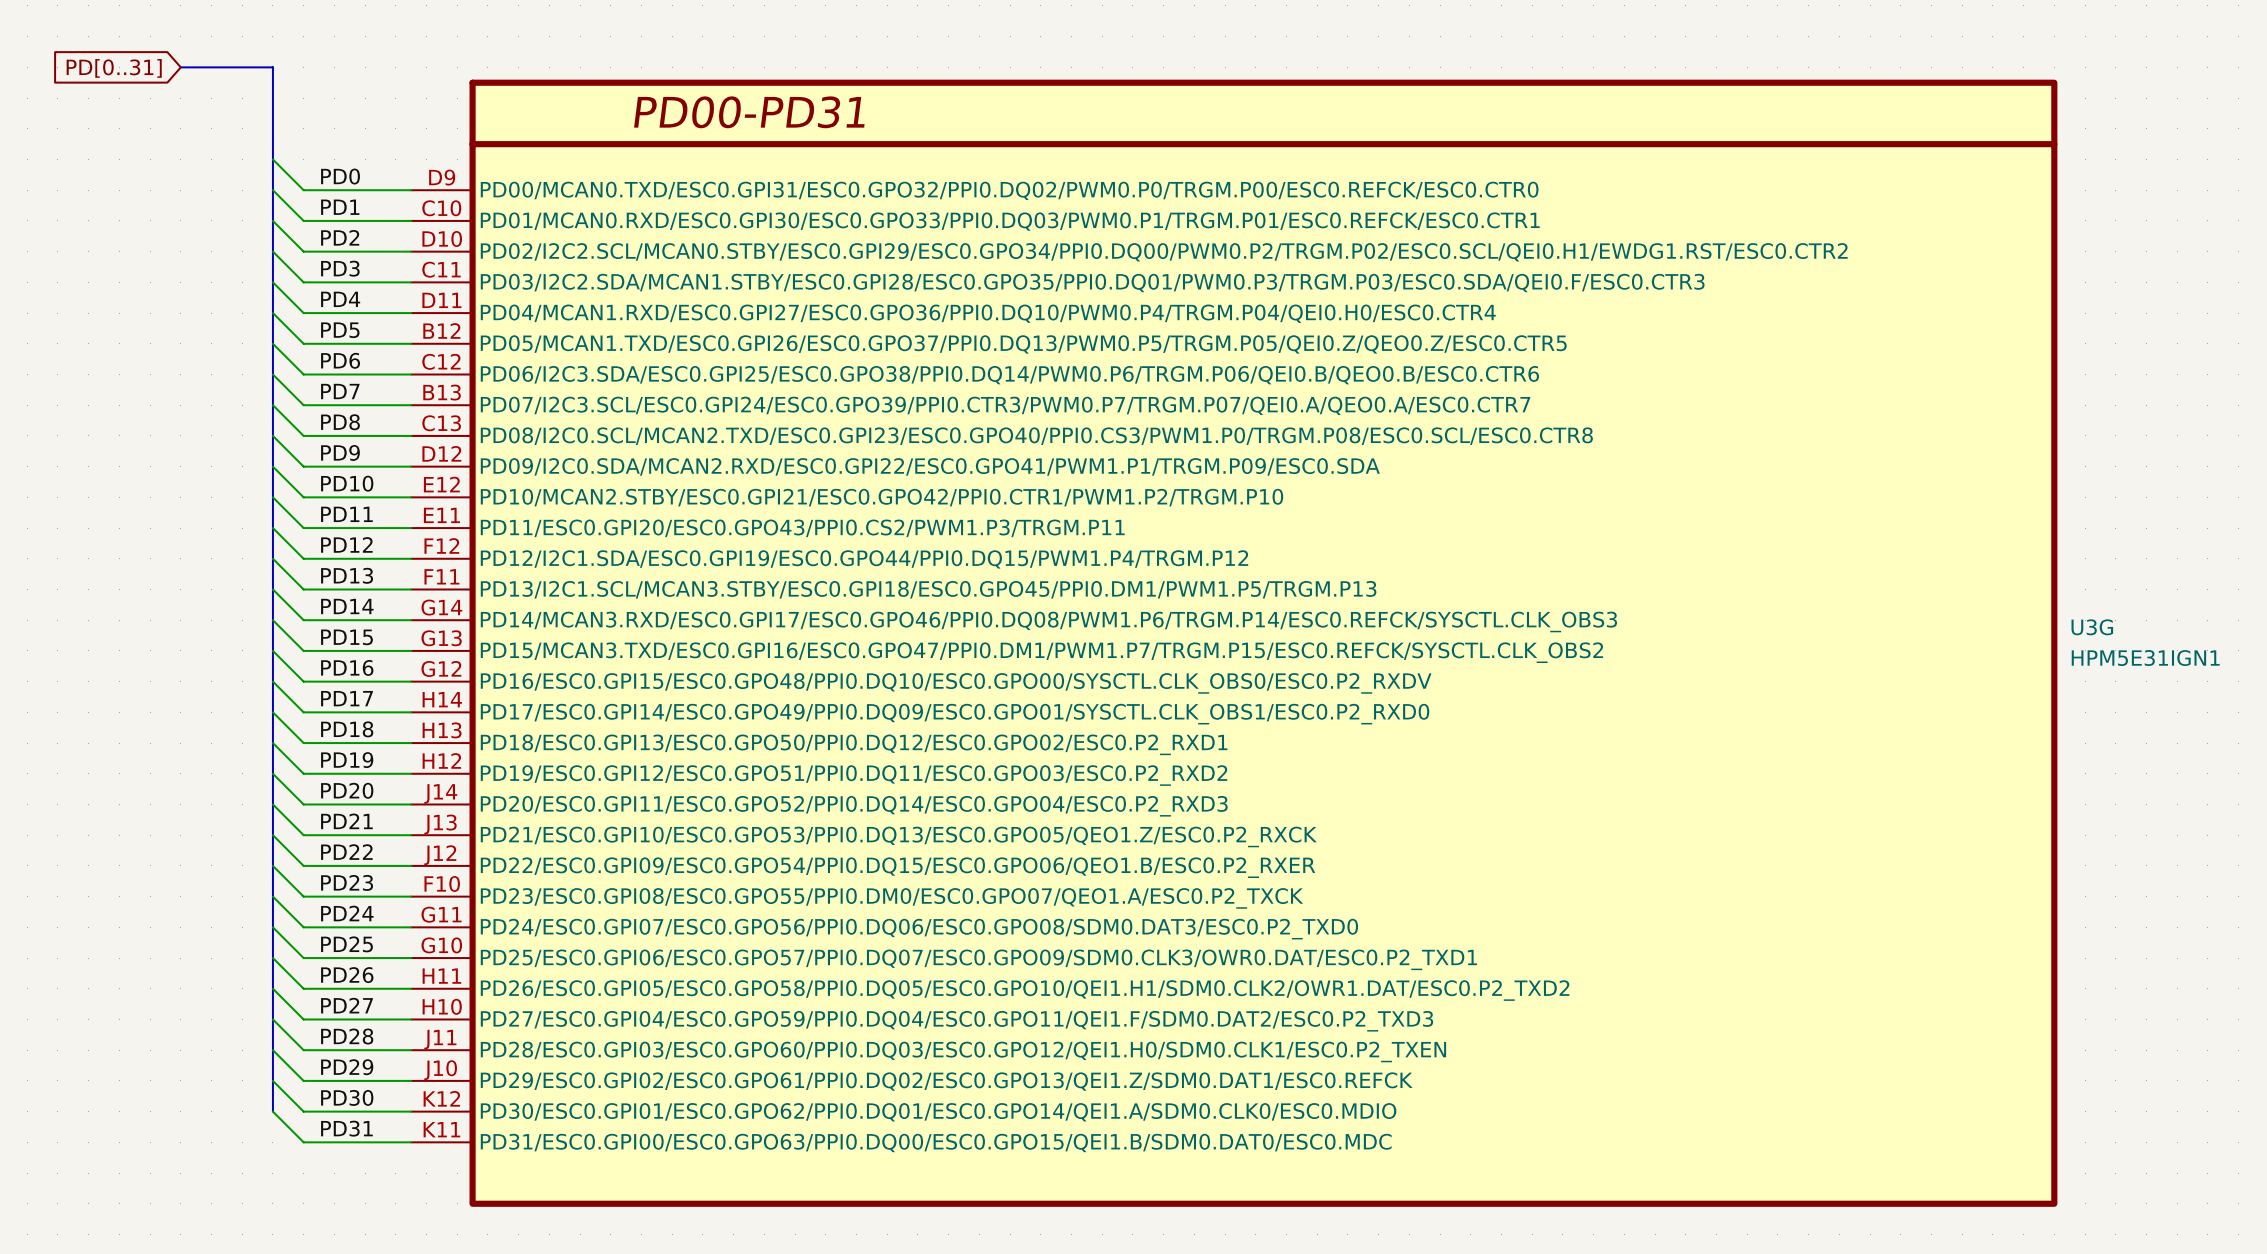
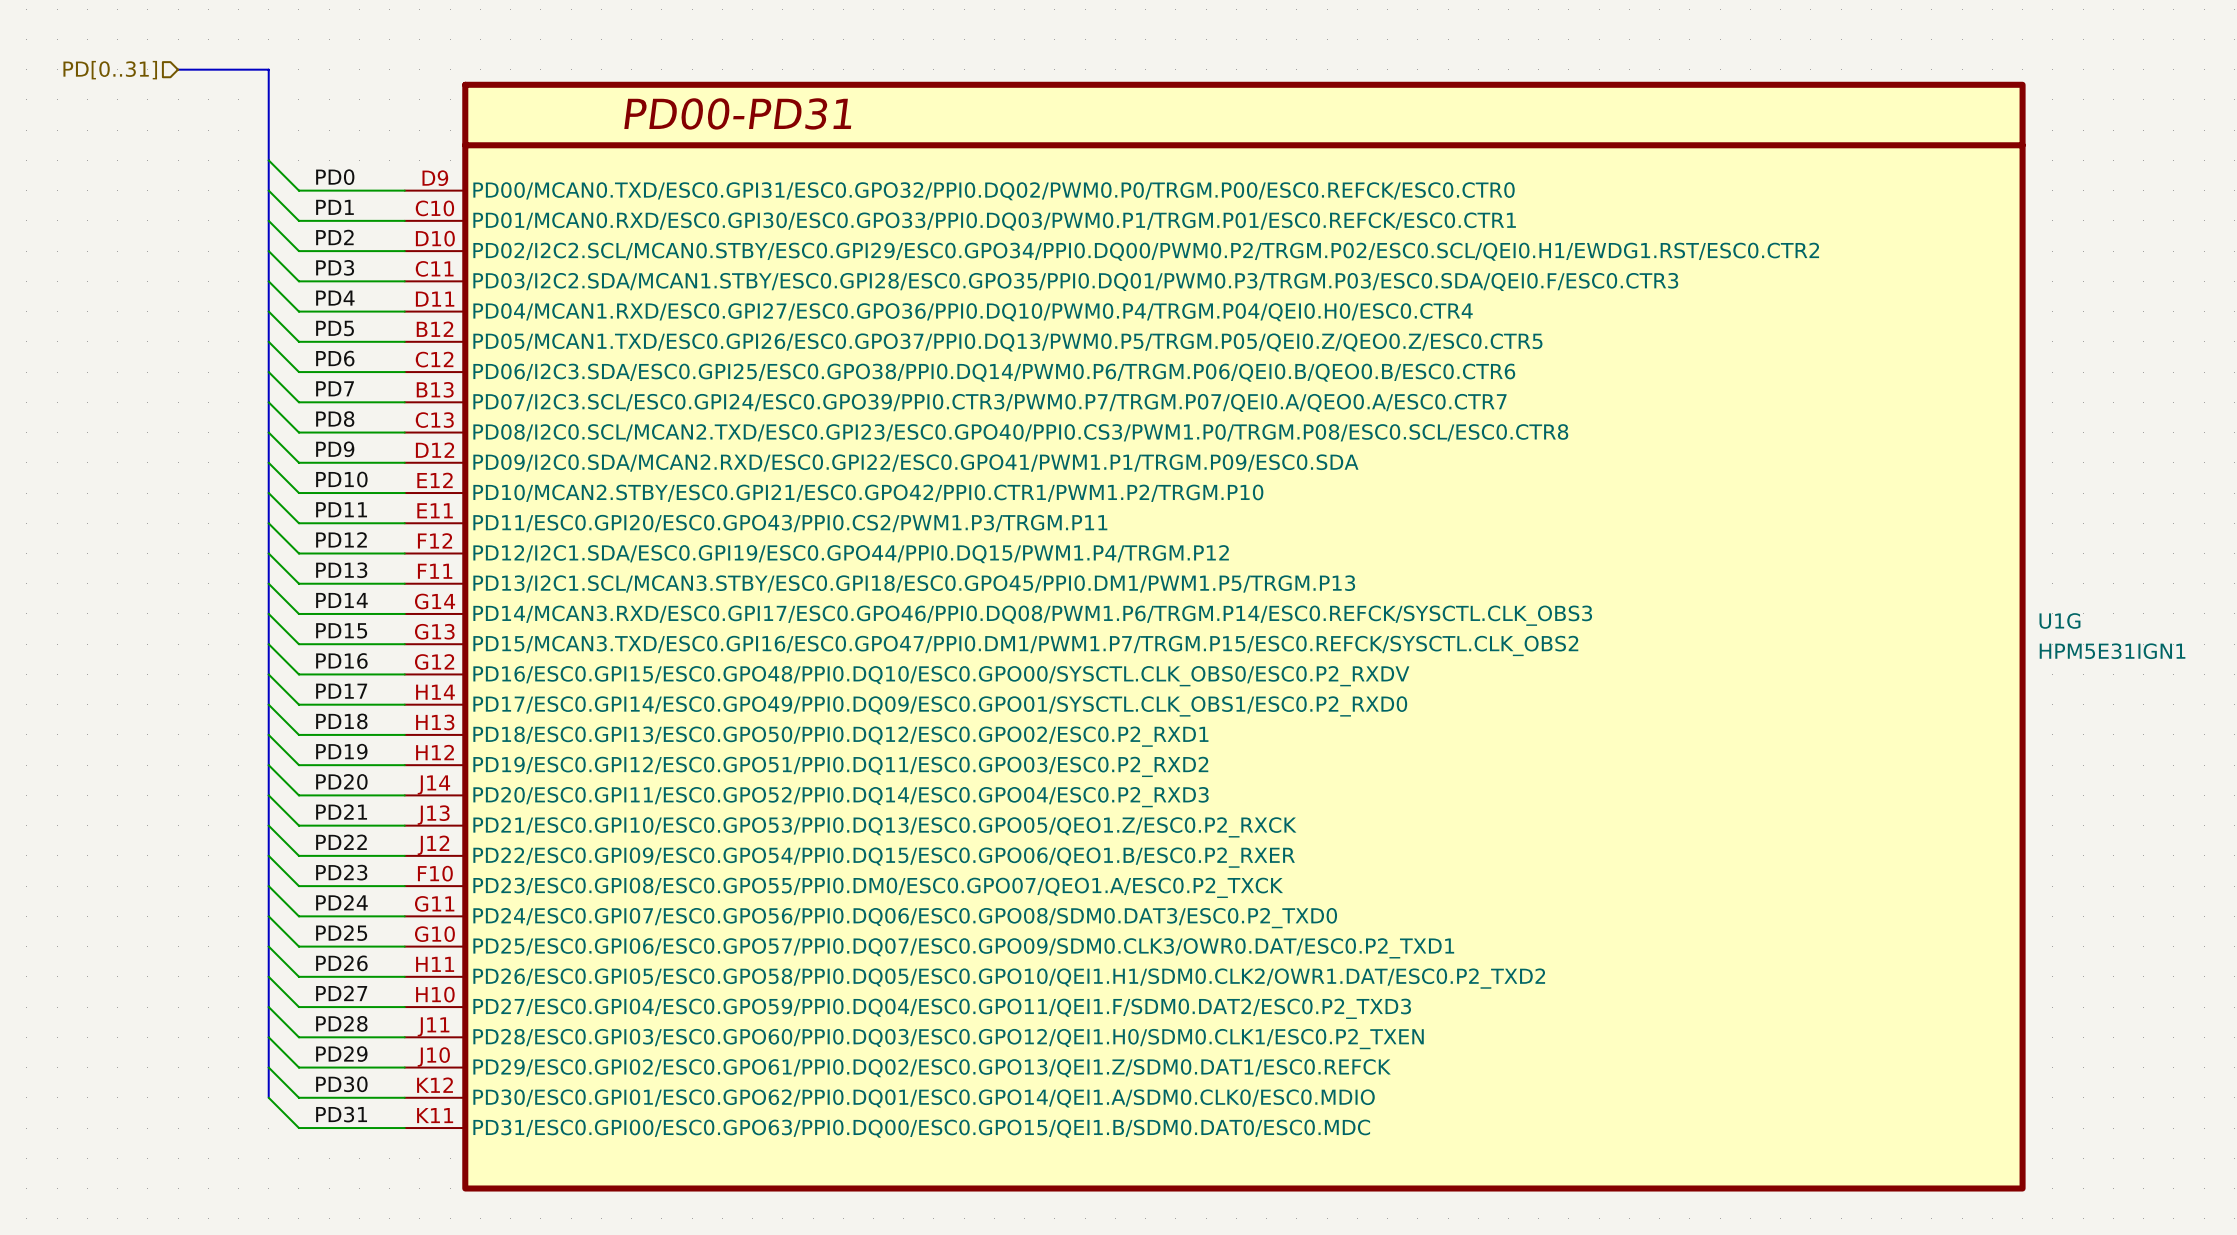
hierarchical label: none -> PD[0..31] (110, 70)
global label: PD[0..31] (114, 68) -> none
U3G name: U3G (2092, 627) -> U1G (2059, 620)

